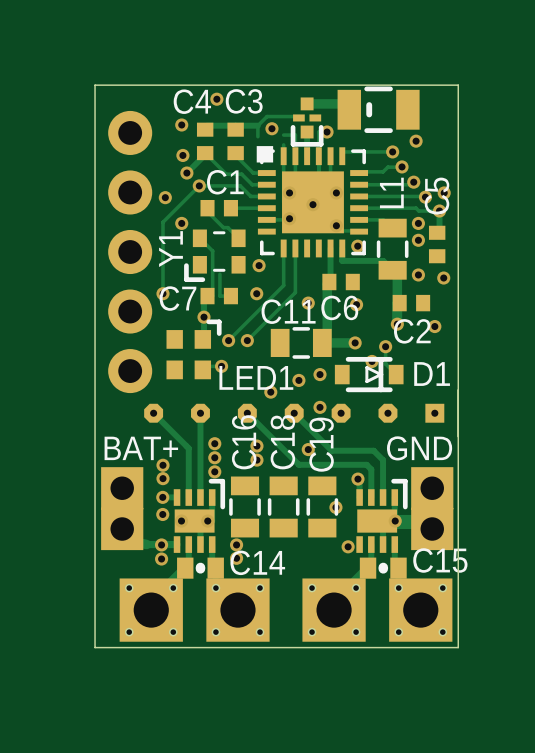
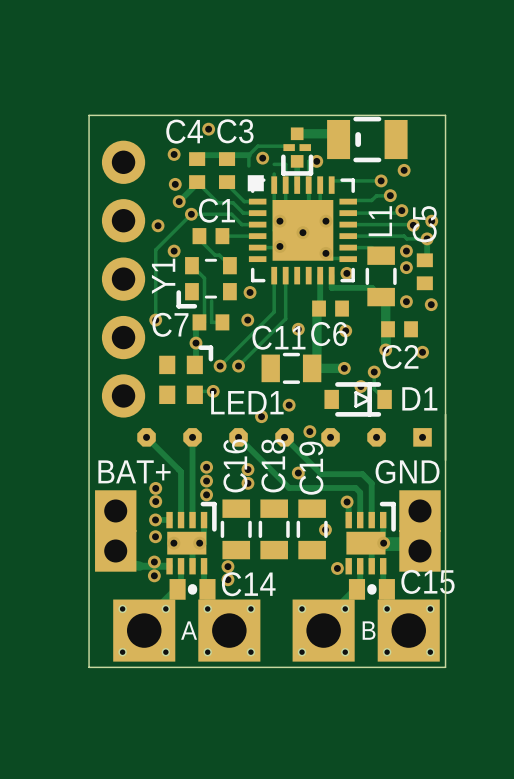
via: (320, 374) -> none
via: none -> (154, 562)
via: (161, 544) -> none
via: none -> (154, 575)
via: (161, 559) -> none
text: none -> A (189, 630)
text: none -> B (369, 630)

